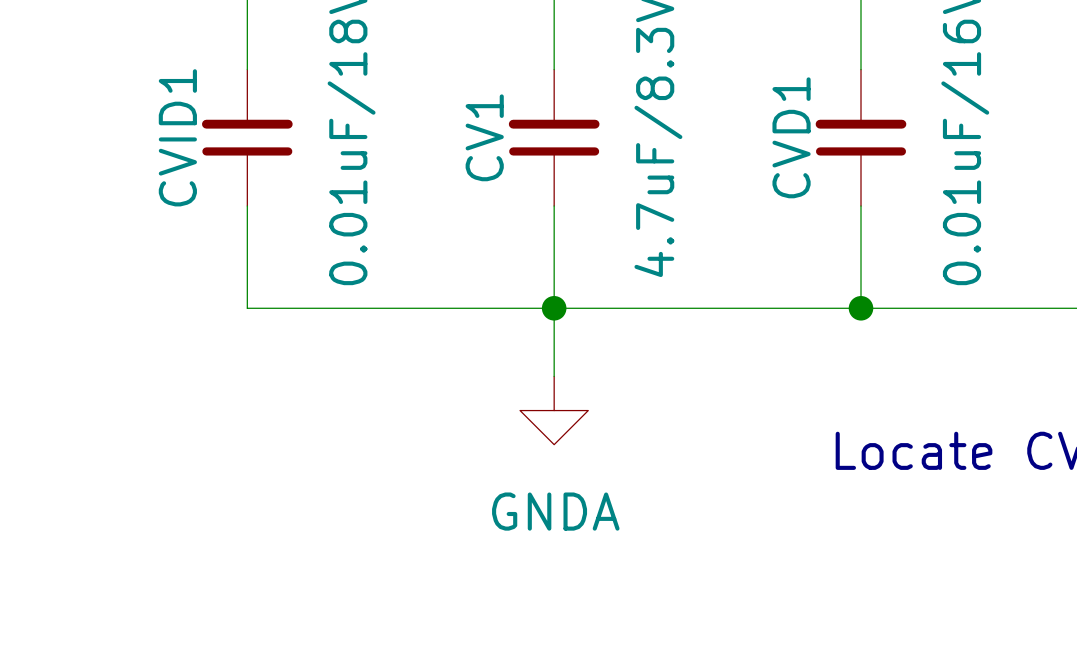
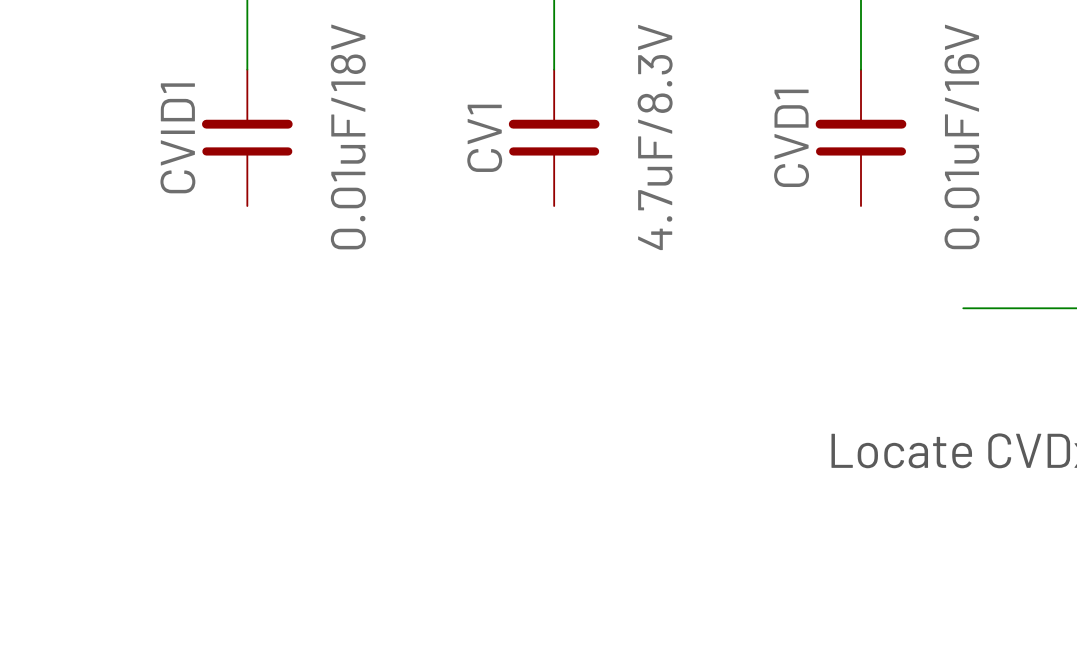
wire: (247, 206) (247, 308) (963, 308) -> none
wire: (554, 206) (554, 376) -> none
wire: (861, 206) (861, 308) -> none
junction: (554, 308) -> none
junction: (861, 308) -> none
power symbol: GNDA (554, 410) -> none

